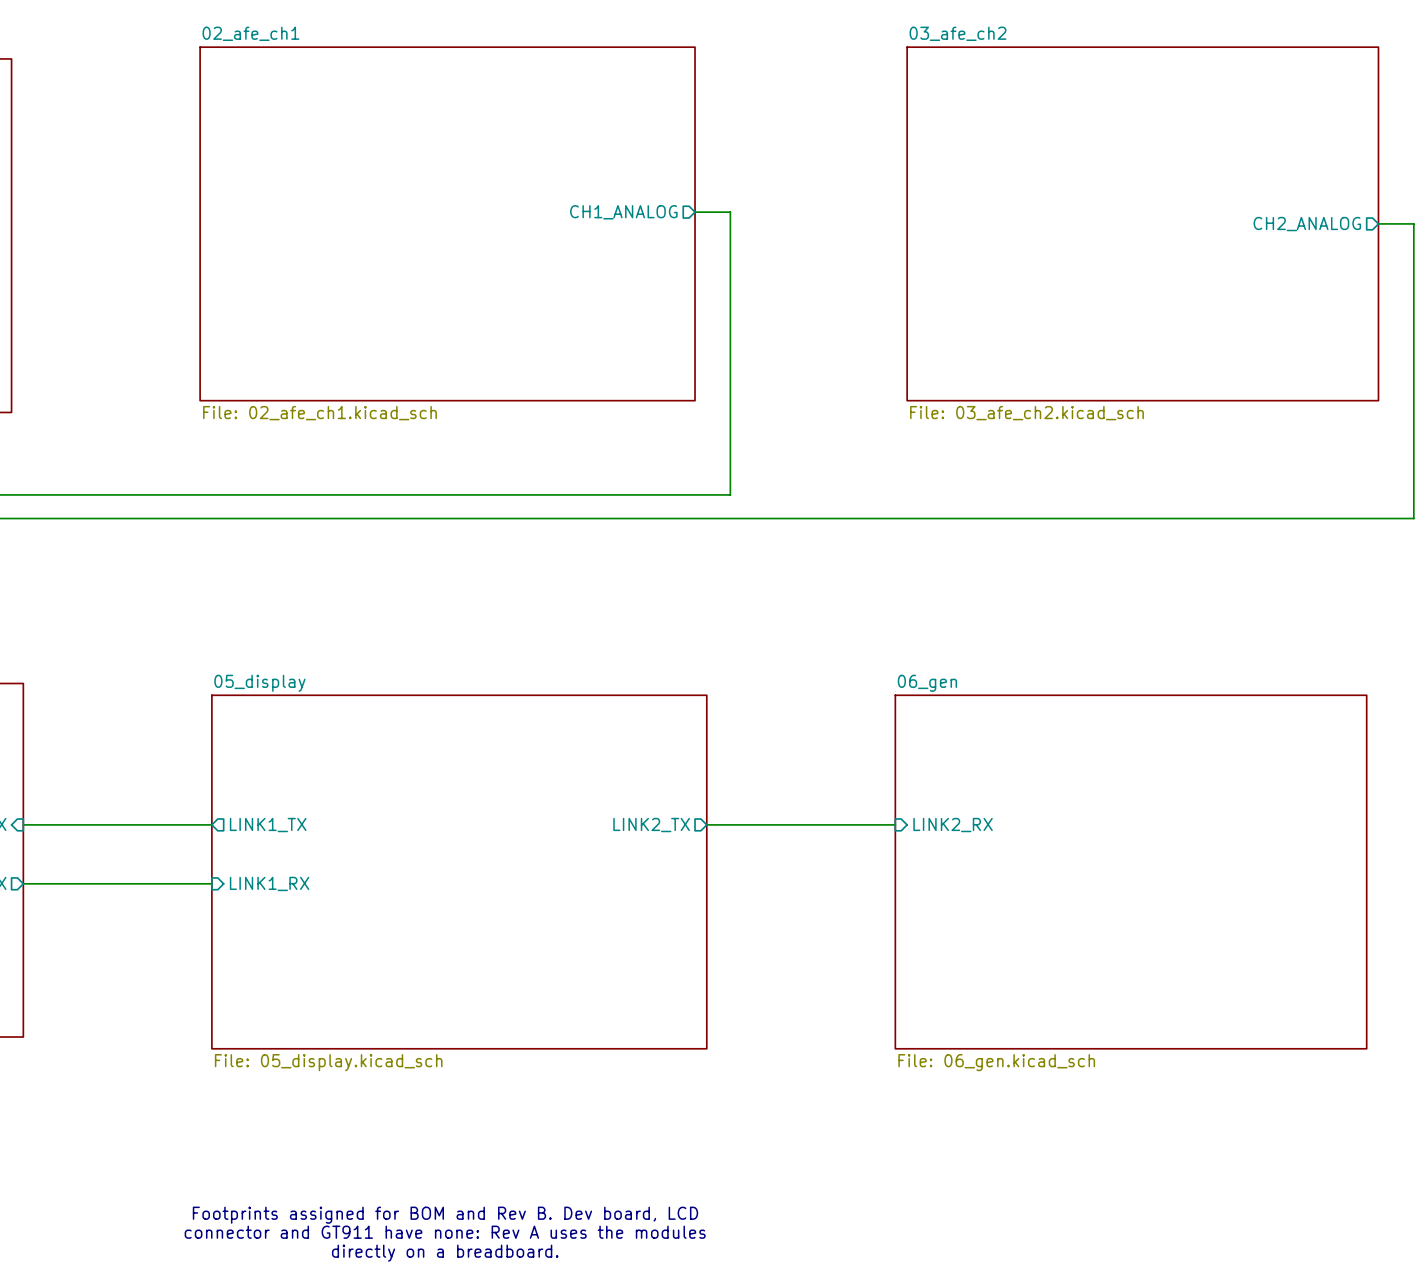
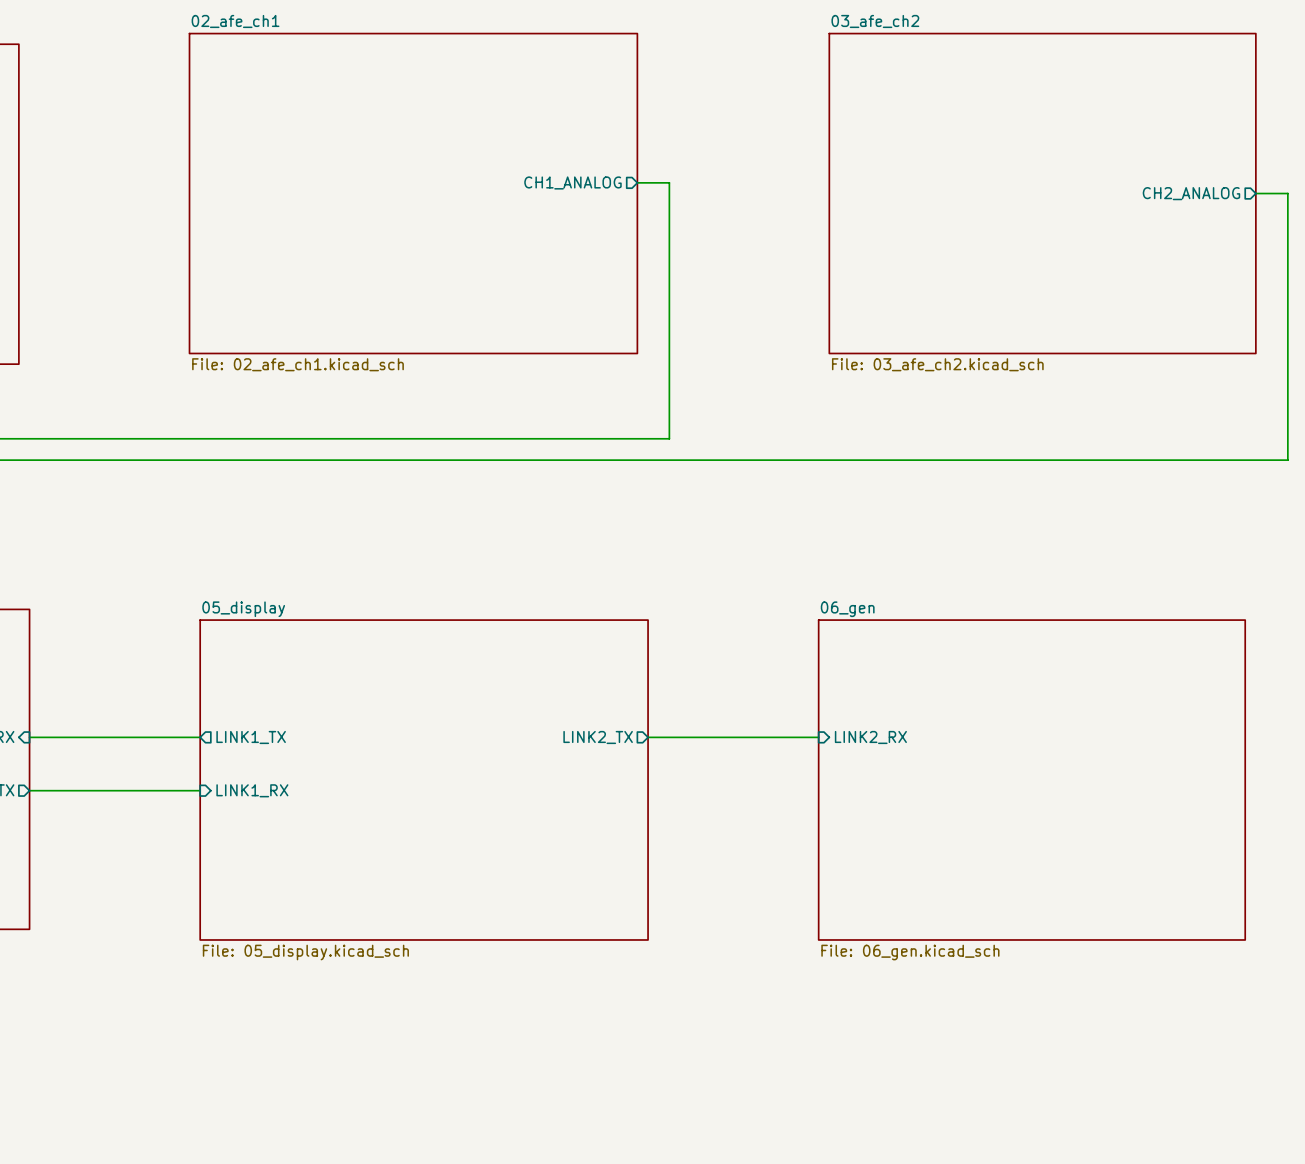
text: Footprints assigned for BOM and Rev B. Dev board, LCD (445, 1215) -> none
text: connector and GT911 have none: Rev A uses the modules (445, 1232) -> none
text: directly on a breadboard. (445, 1253) -> none

